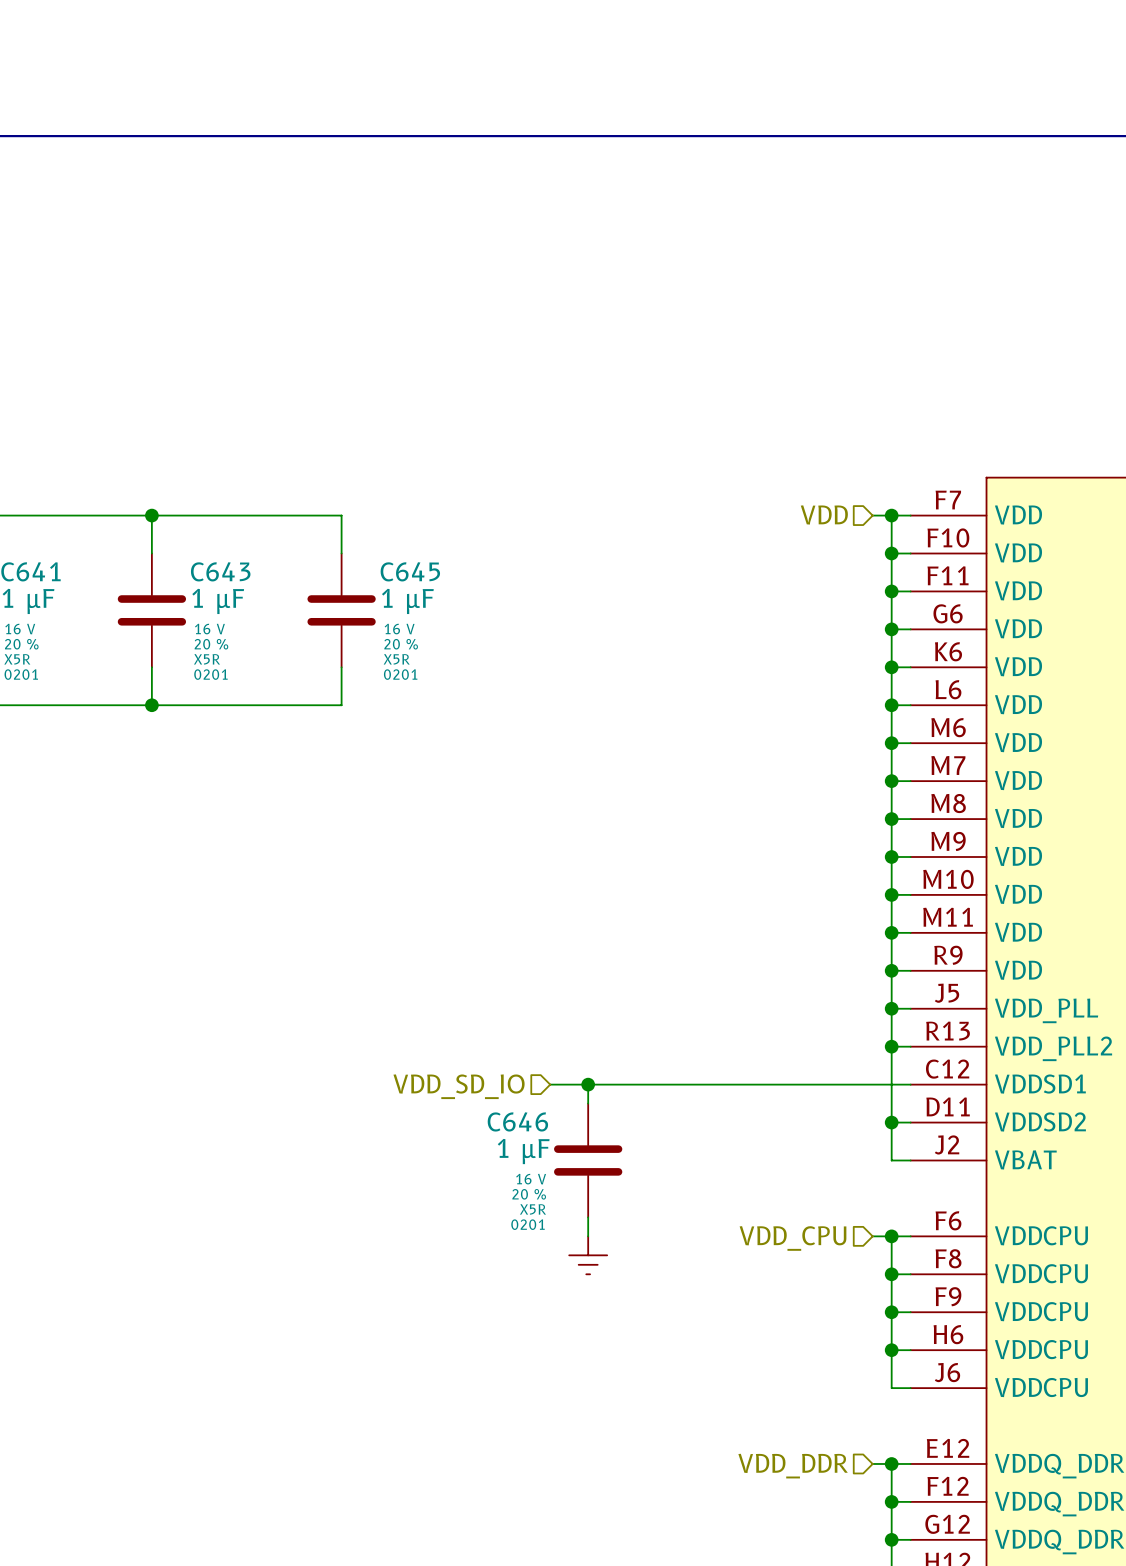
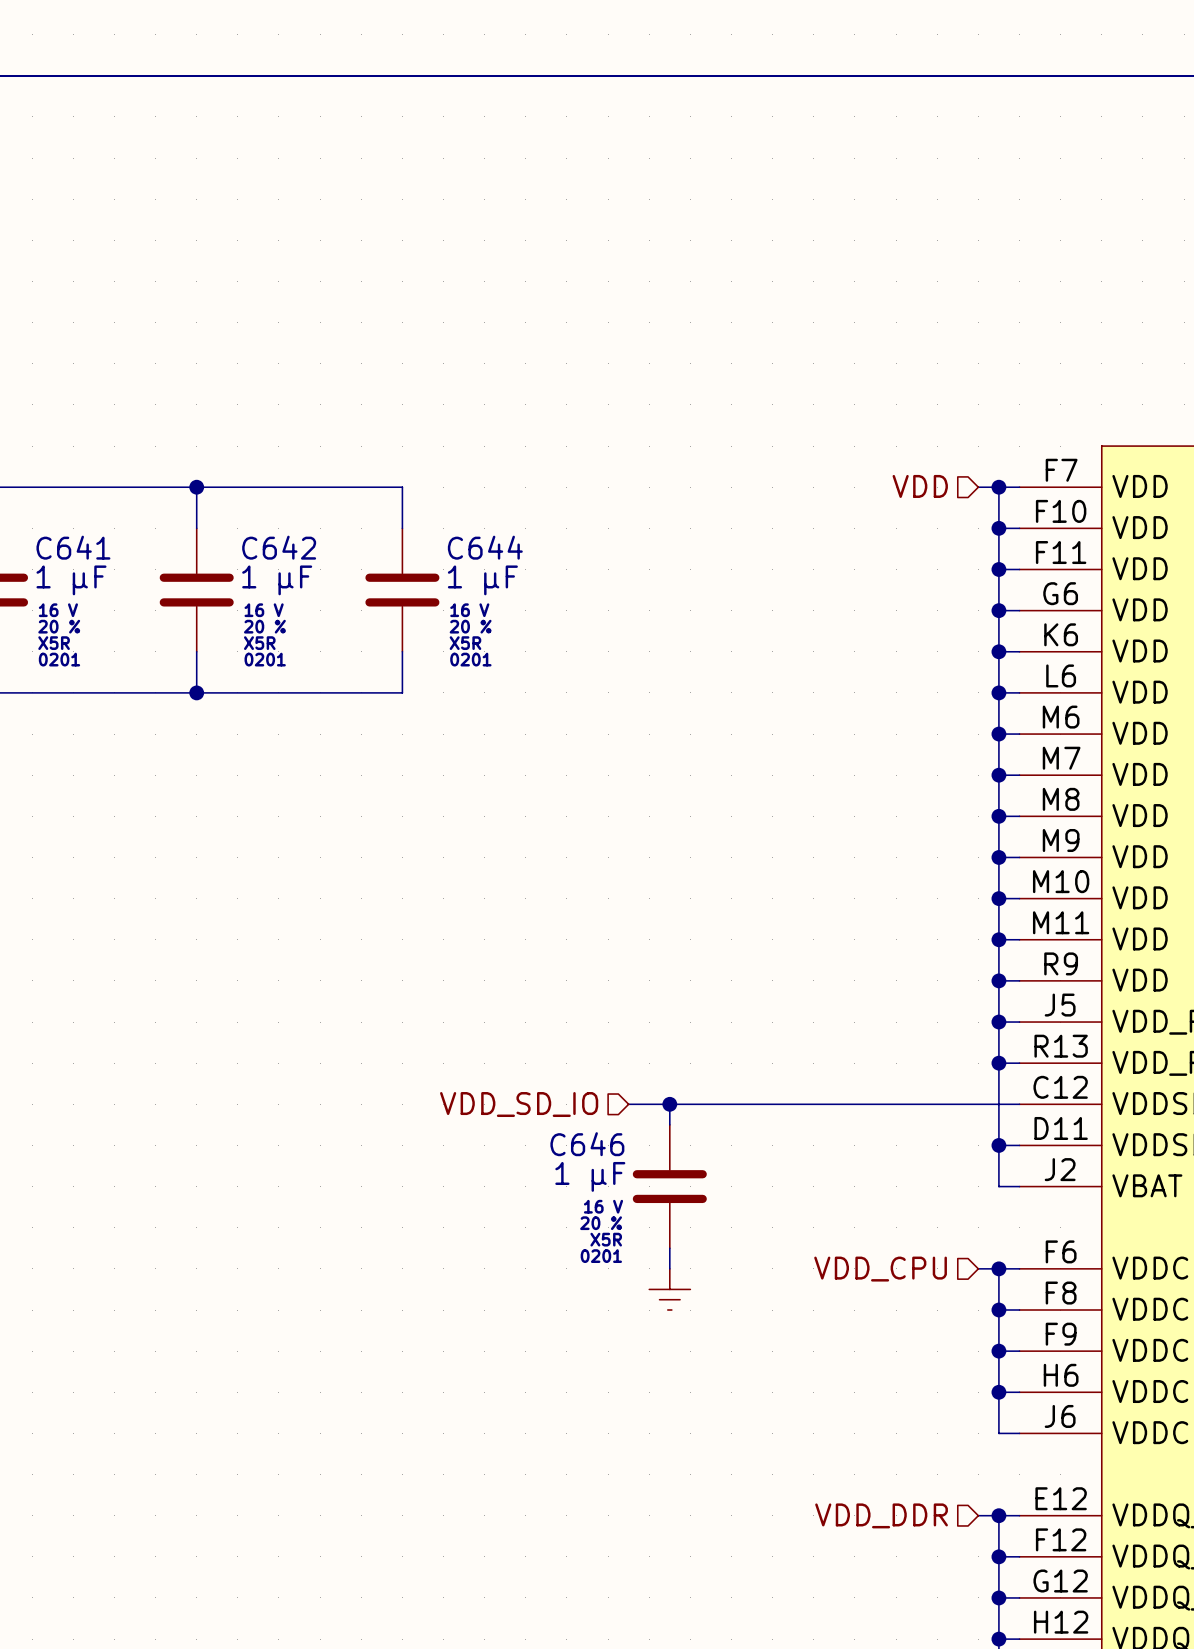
C643 name: C643 (220, 571) -> C642 (279, 547)
C645 name: C645 (410, 571) -> C644 (485, 547)

